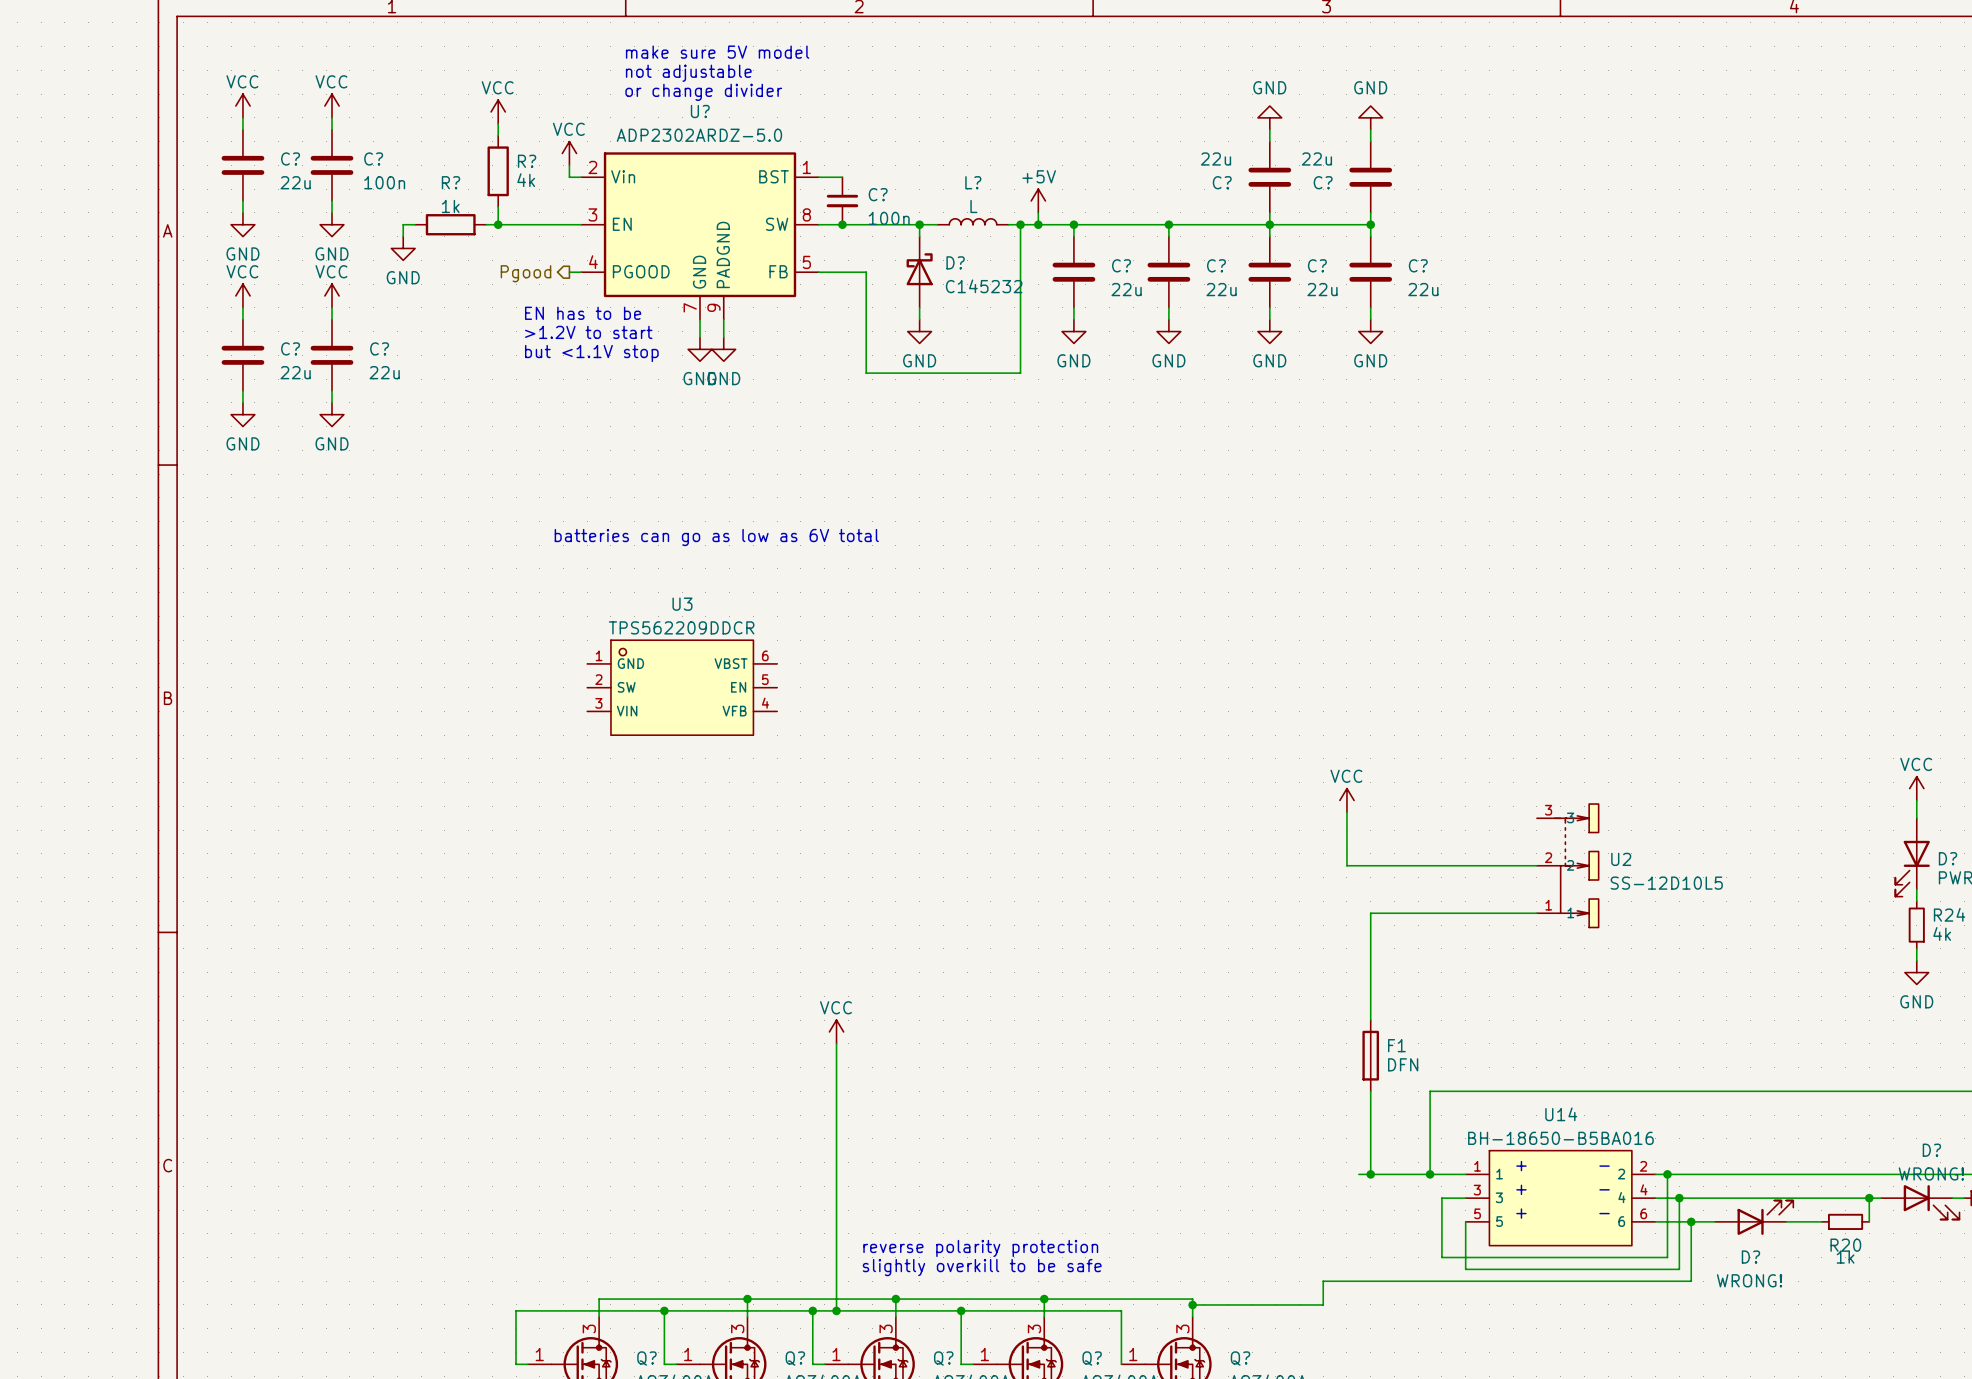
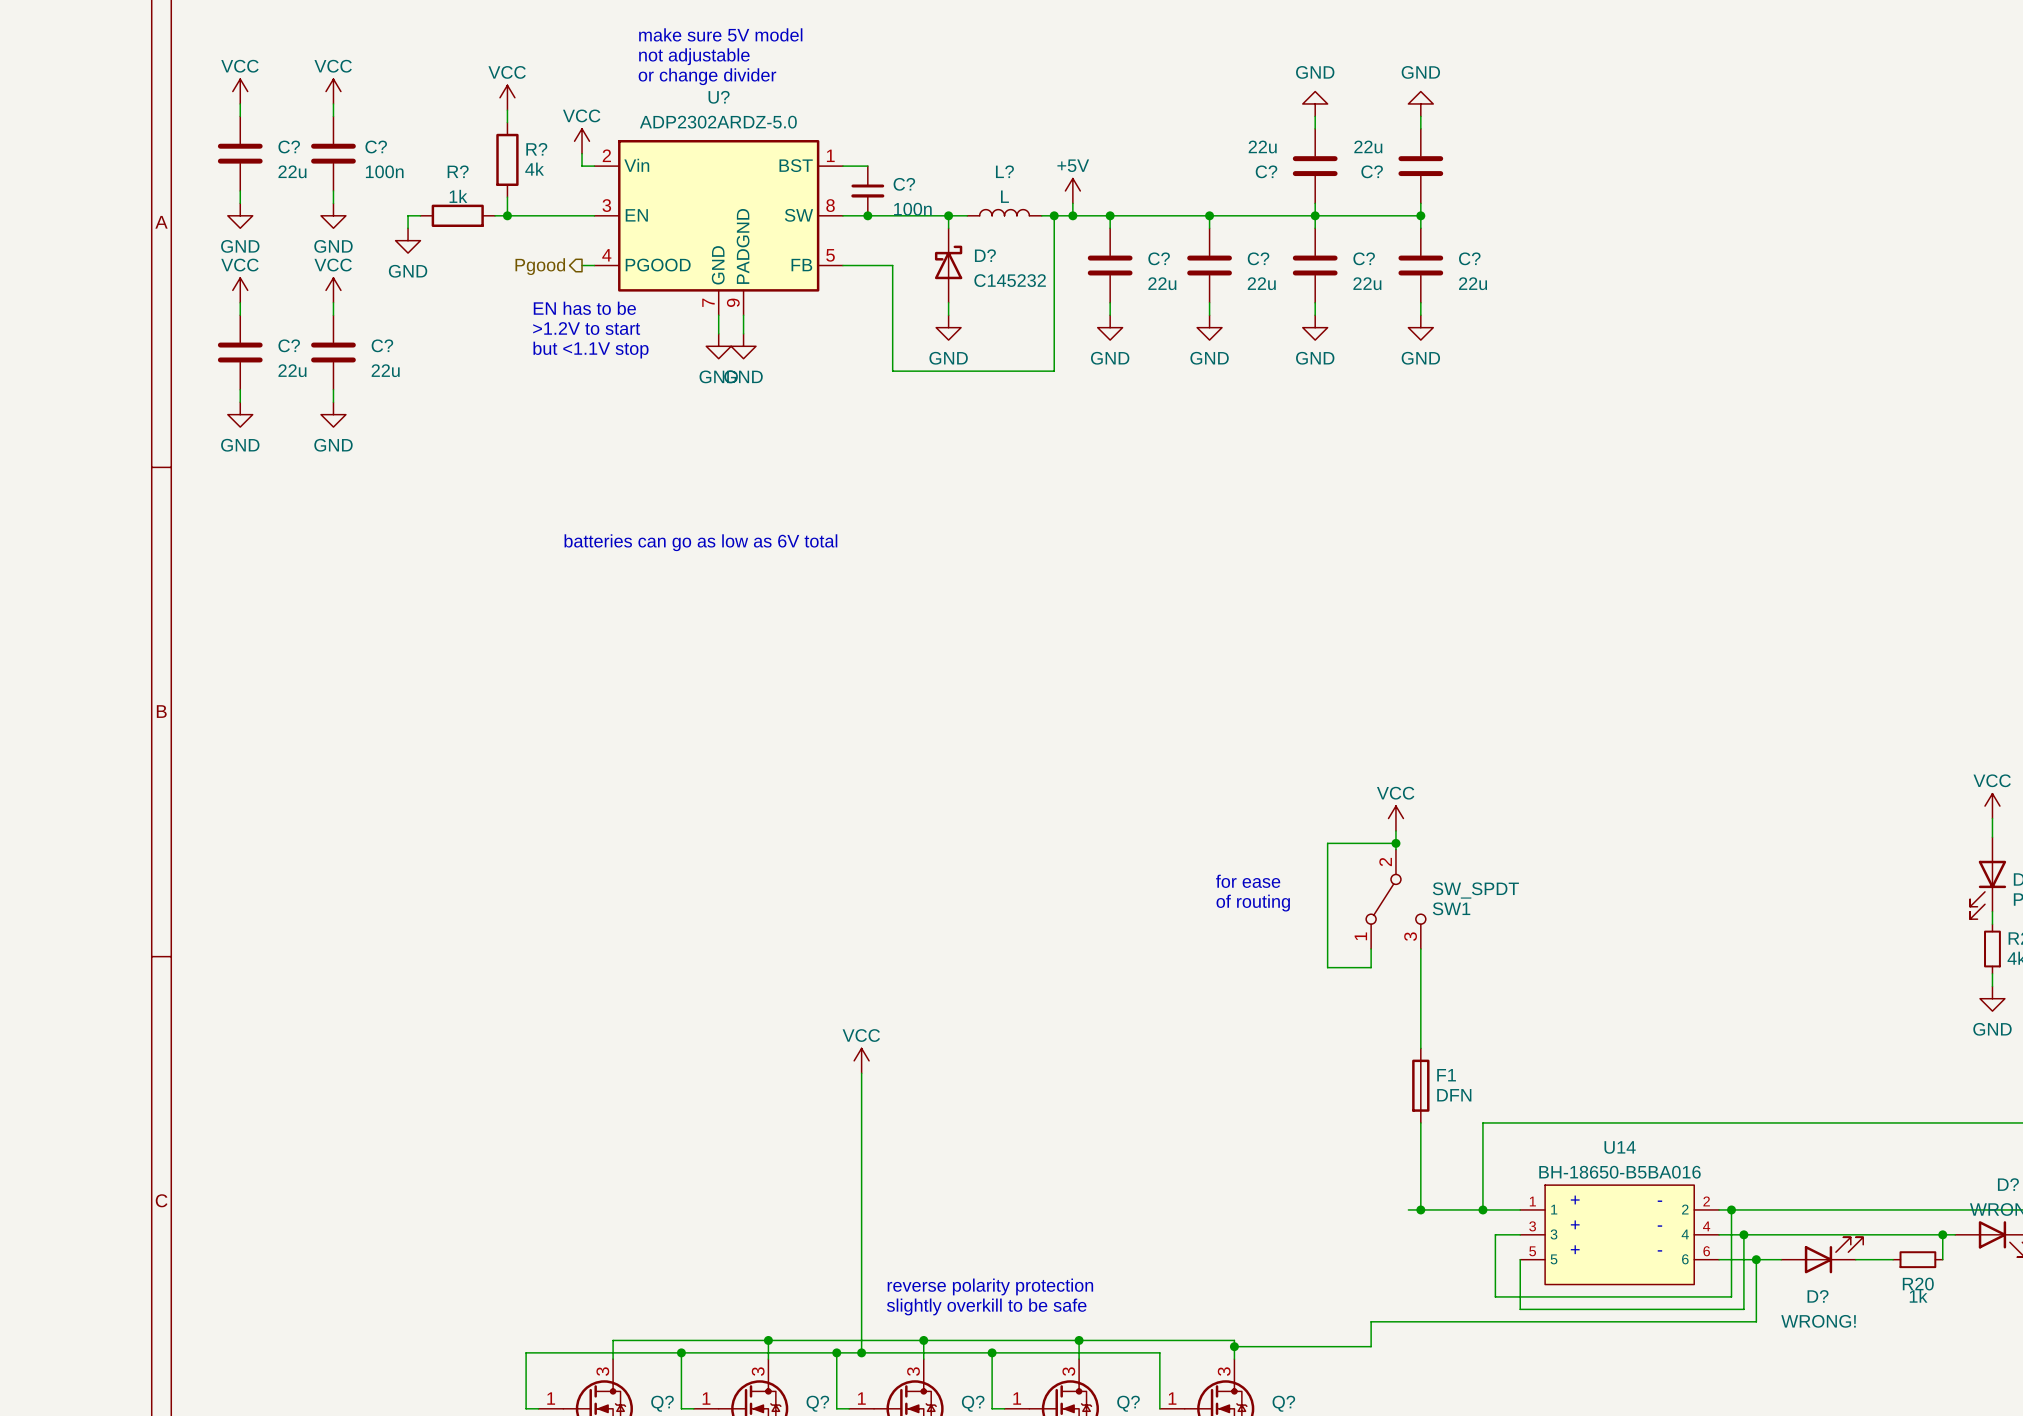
U3: TPS562209DDCR (682, 687) -> none
wire: none -> (1395, 843) (1327, 843) (1327, 967) (1371, 967) (1371, 949)
junction: none -> (1395, 843)
wire: (1346, 830) (1346, 865) (1536, 865) -> none
text: none -> for ease (1248, 881)
U2: SS-12D10L5 (1567, 865) -> none
SW1: none -> SW_SPDT (1395, 899)
text: none -> of routing (1253, 903)
wire: (1536, 913) (1370, 913) (1370, 925) -> none

